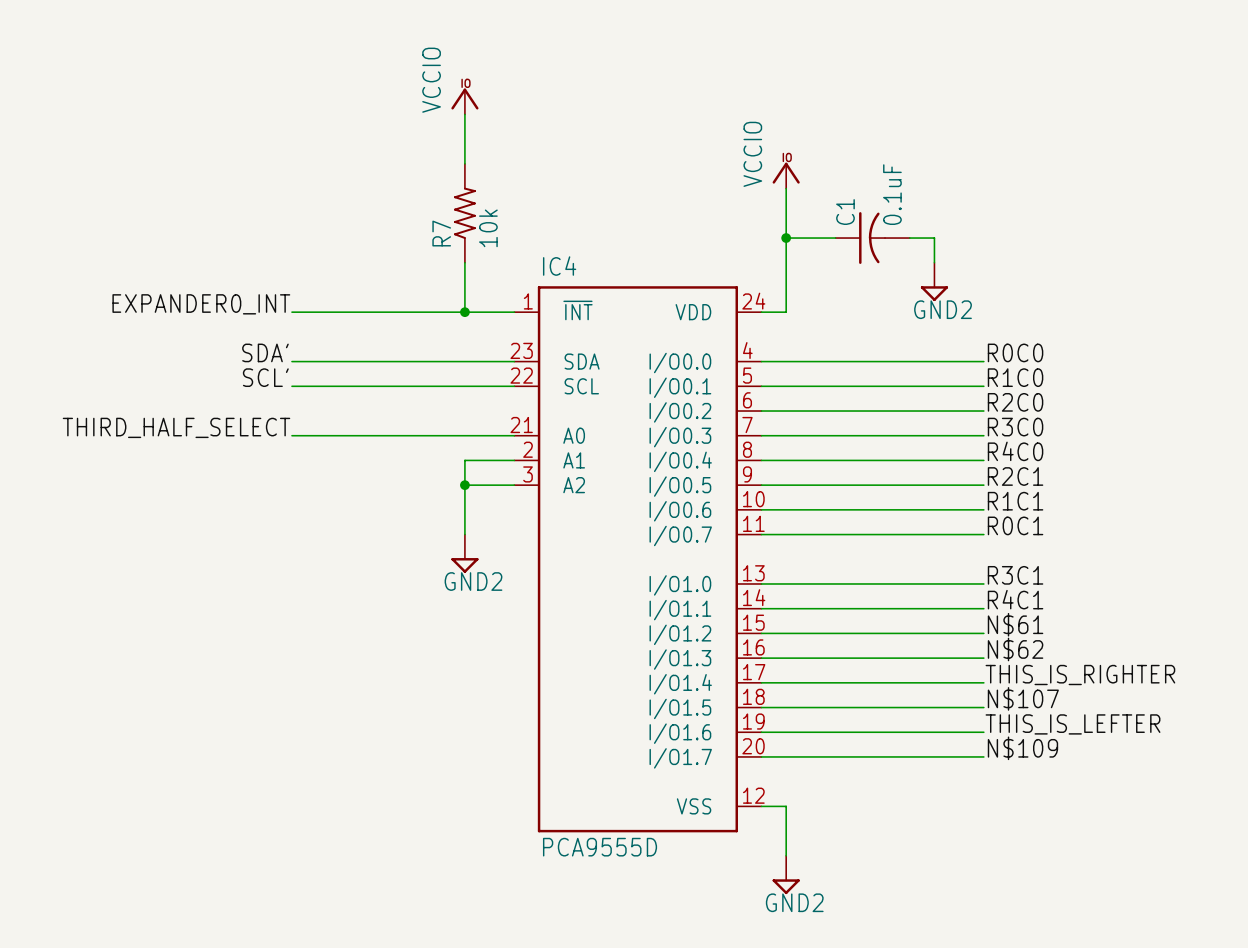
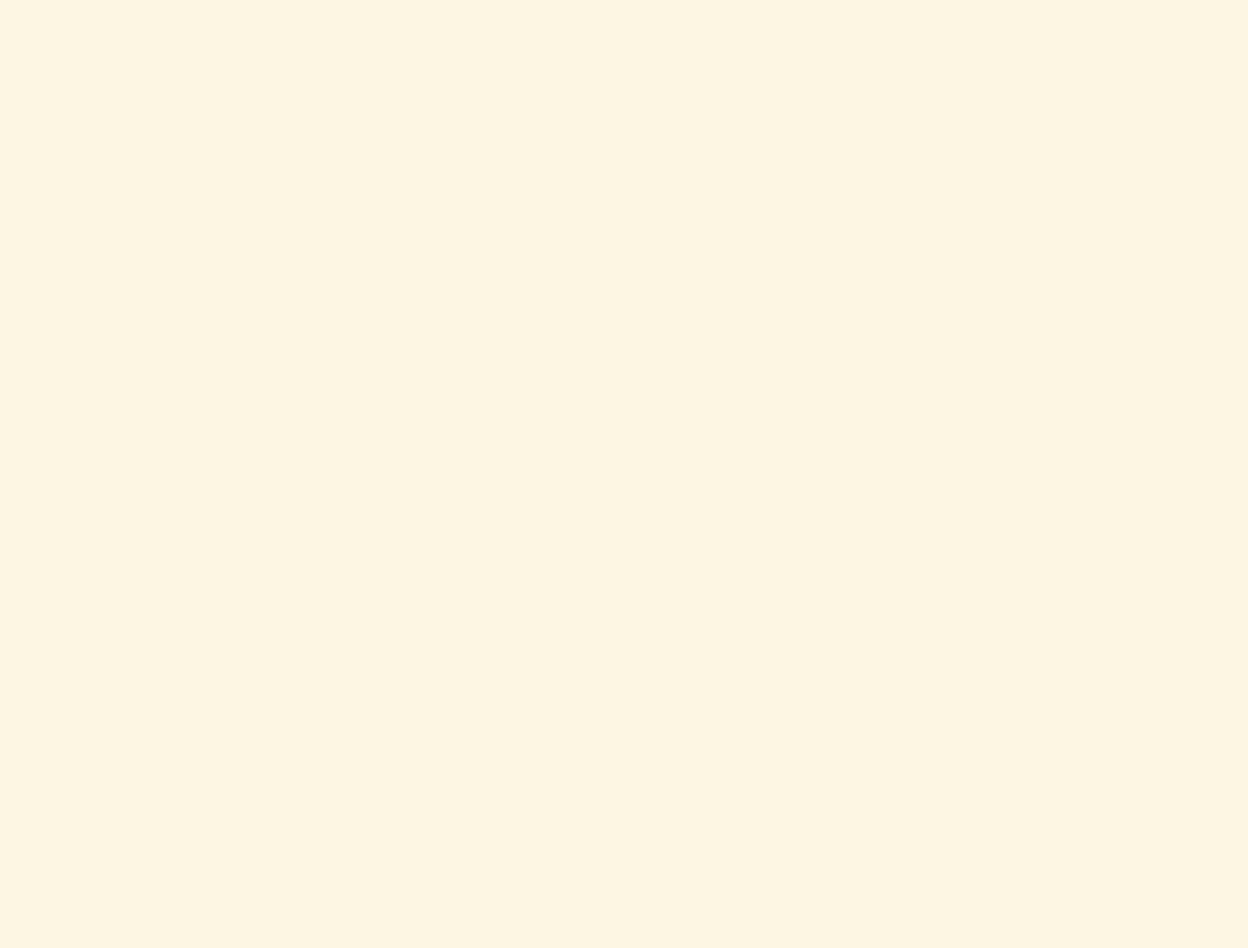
power symbol: VCCIO (464, 101) -> none
wire: (464, 114) (464, 163) -> none
power symbol: VCCIO (786, 175) -> none
wire: (786, 188) (786, 312) (761, 312) -> none
R7: 10k (464, 213) -> none
wire: (786, 238) (835, 238) -> none
junction: (786, 238) -> none
C1: 0.1uF (872, 238) -> none
wire: (909, 238) (934, 238) (934, 262) -> none
wire: (464, 262) (464, 312) -> none
power symbol: GND2 (934, 281) -> none
label: EXPANDER0_INT (201, 304) -> none
wire: (291, 312) (514, 312) -> none
junction: (464, 312) -> none
label: SDA' (265, 352) -> none
label: R0C0 (1015, 352) -> none
wire: (291, 361) (514, 361) -> none
wire: (761, 361) (983, 361) -> none
label: SCL' (265, 377) -> none
label: R1C0 (1015, 377) -> none
wire: (291, 386) (514, 386) -> none
wire: (761, 386) (983, 386) -> none
label: R2C0 (1015, 402) -> none
wire: (761, 411) (983, 411) -> none
label: THIRD_HALF_SELECT (176, 427) -> none
label: R3C0 (1015, 427) -> none
wire: (291, 435) (514, 435) -> none
wire: (761, 435) (983, 435) -> none
label: R4C0 (1015, 451) -> none
wire: (514, 460) (464, 460) (464, 534) -> none
wire: (761, 460) (983, 460) -> none
label: R2C1 (1015, 476) -> none
wire: (464, 485) (514, 485) -> none
junction: (464, 485) -> none
wire: (761, 485) (983, 485) -> none
label: R1C1 (1015, 501) -> none
wire: (761, 509) (983, 509) -> none
label: R0C1 (1015, 525) -> none
wire: (761, 534) (983, 534) -> none
power symbol: GND2 (464, 553) -> none
IC4: PCA9555D (637, 559) -> none
label: R3C1 (1015, 575) -> none
wire: (761, 583) (983, 583) -> none
label: R4C1 (1015, 599) -> none
wire: (761, 608) (983, 608) -> none
label: N$61 (1015, 624) -> none
wire: (761, 633) (983, 633) -> none
label: N$62 (1015, 649) -> none
wire: (761, 658) (983, 658) -> none
label: THIS_IS_RIGHTER (1080, 675) -> none
wire: (761, 682) (983, 682) -> none
label: N$107 (1023, 698) -> none
wire: (761, 707) (983, 707) -> none
label: THIS_IS_LEFTER (1073, 724) -> none
wire: (761, 732) (983, 732) -> none
label: N$109 (1022, 748) -> none
wire: (761, 756) (983, 756) -> none
wire: (761, 806) (786, 806) (786, 855) -> none
power symbol: GND2 (786, 874) -> none

